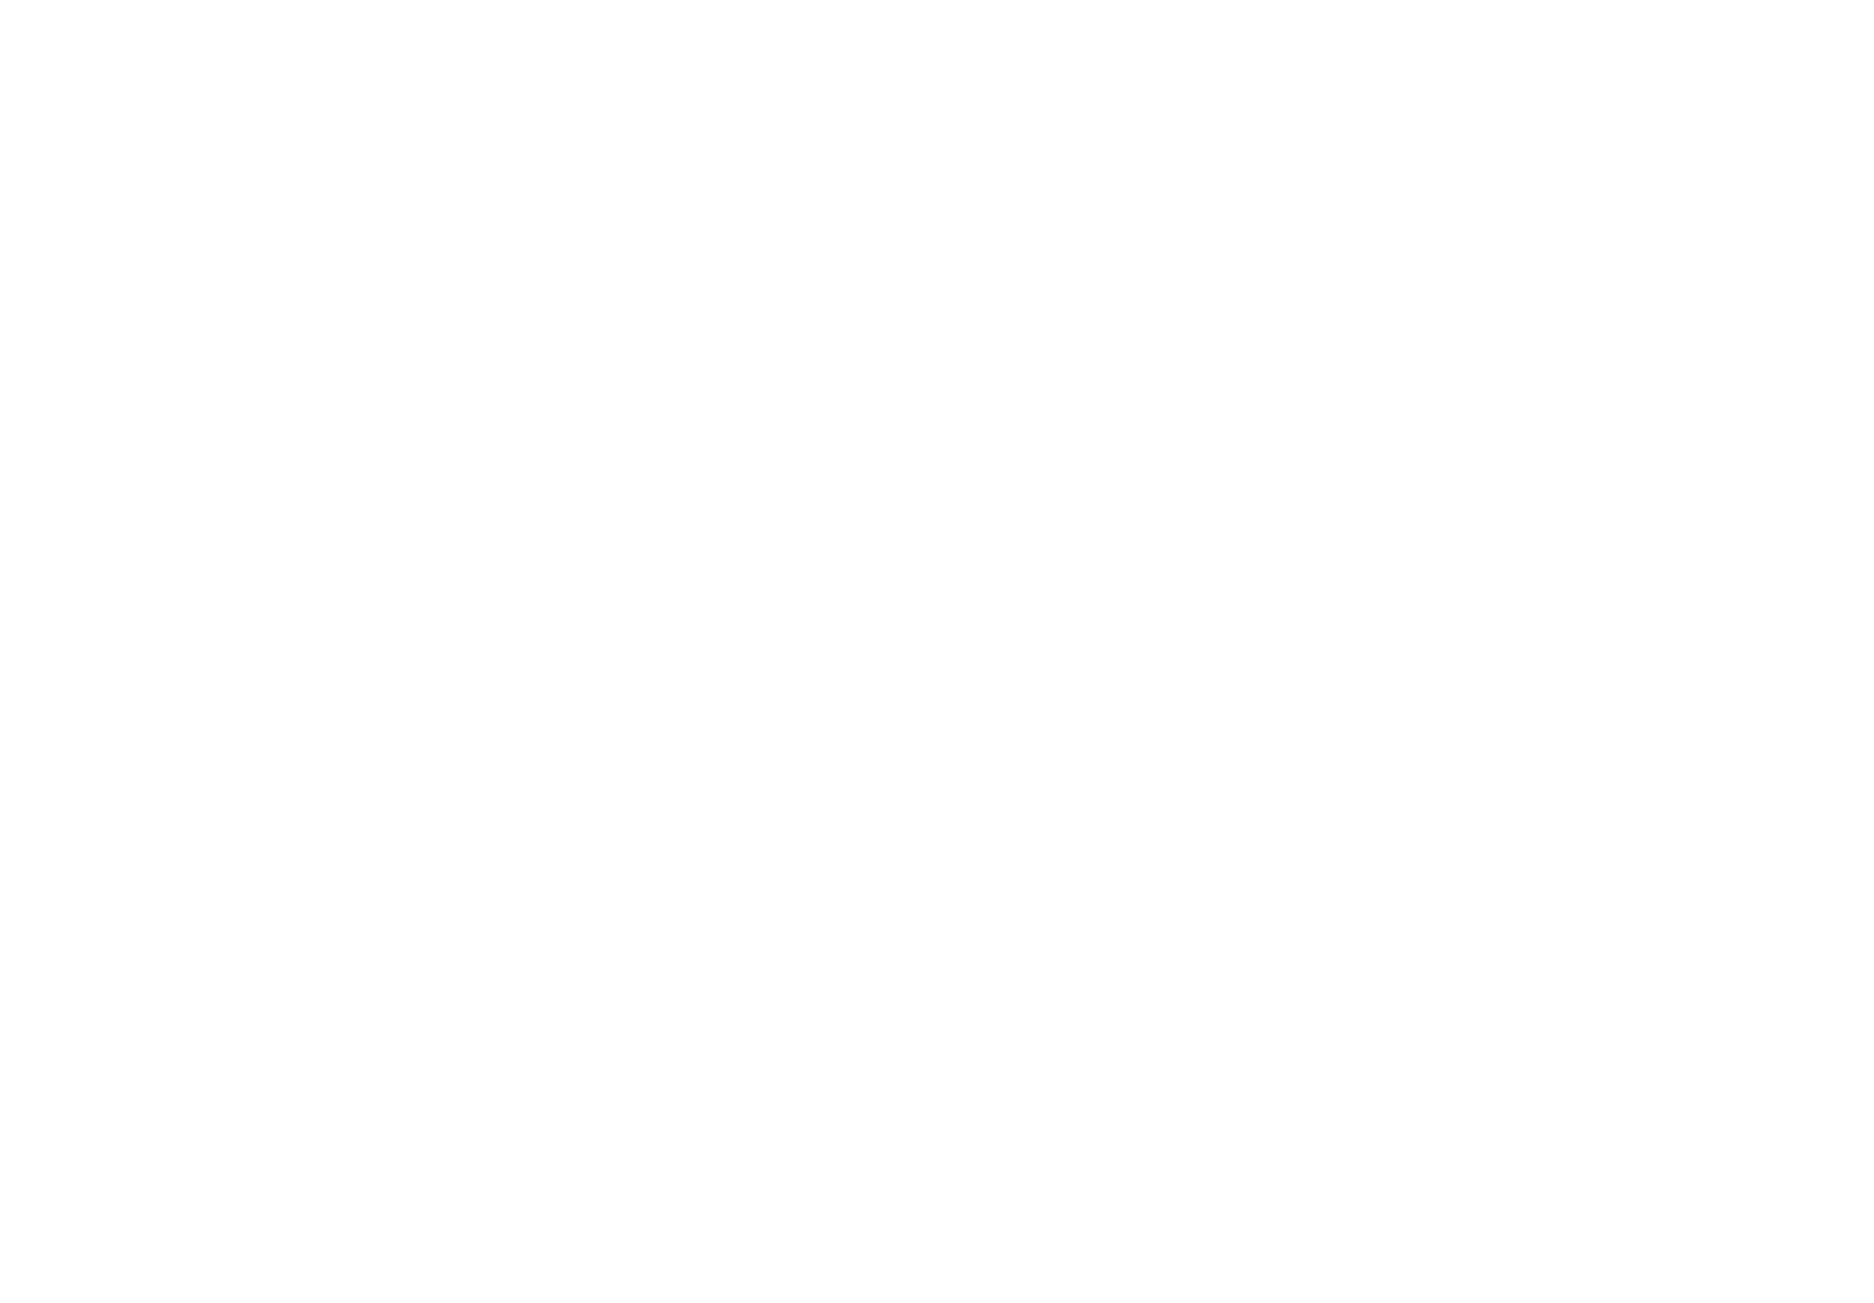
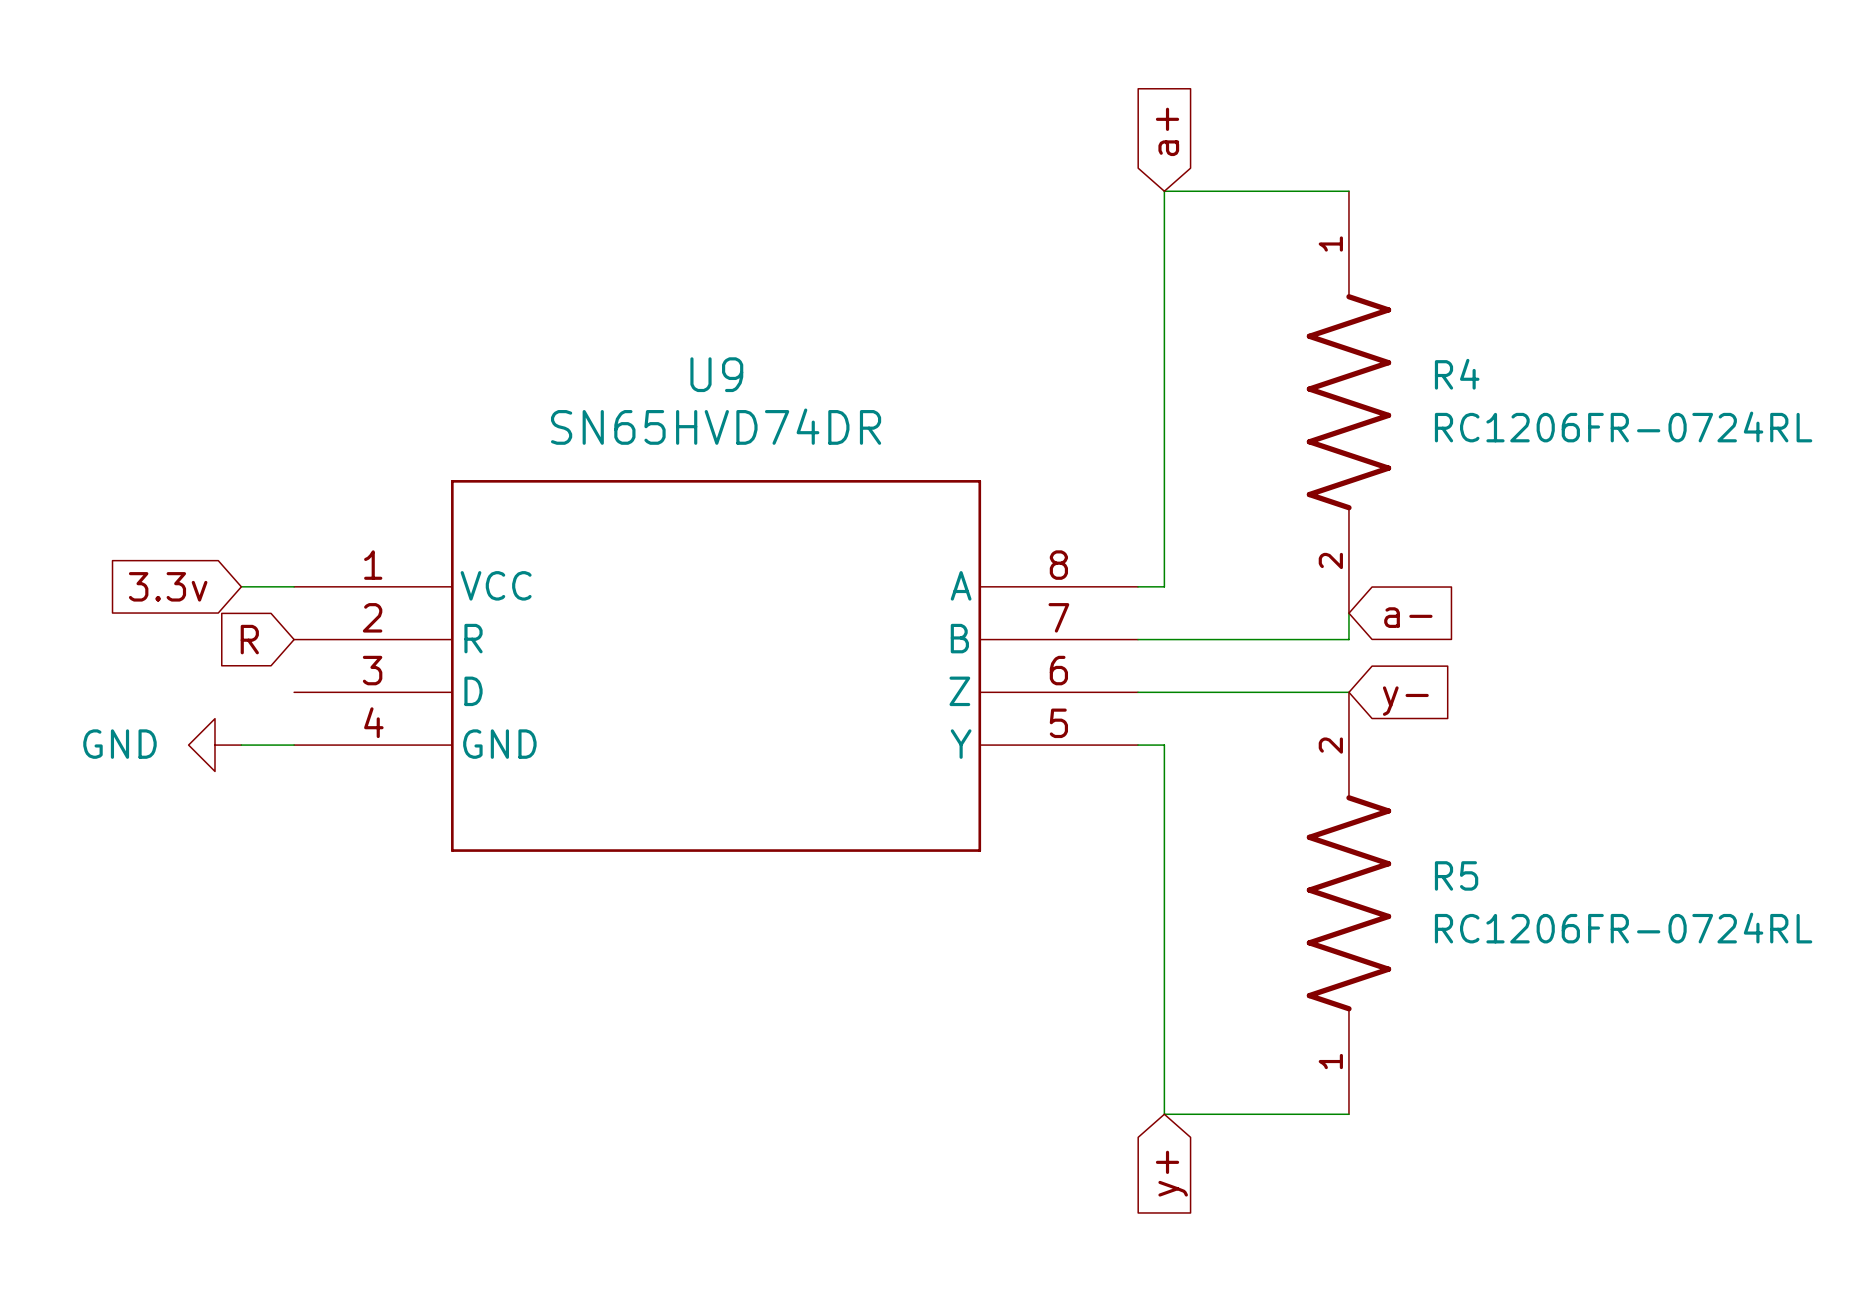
global label: none -> a+ (1167, 131)
wire: none -> (1348, 191) (1164, 191) (1164, 586) (1138, 586)
R4: none -> RC1206FR-0724RL (1348, 402)
global label: none -> 3.3v (168, 586)
wire: none -> (241, 586) (294, 586)
wire: none -> (1348, 613) (1348, 639) (1138, 639)
global label: none -> a- (1408, 617)
global label: none -> R (249, 639)
U9: none -> SN65HVD74DR (716, 665)
wire: none -> (1138, 692) (1348, 692)
global label: none -> y- (1405, 701)
power symbol: none -> GND (214, 745)
wire: none -> (241, 745) (294, 745)
wire: none -> (1138, 745) (1164, 745) (1164, 1114) (1348, 1114)
R5: none -> RC1206FR-0724RL (1348, 903)
global label: none -> y+ (1171, 1173)

